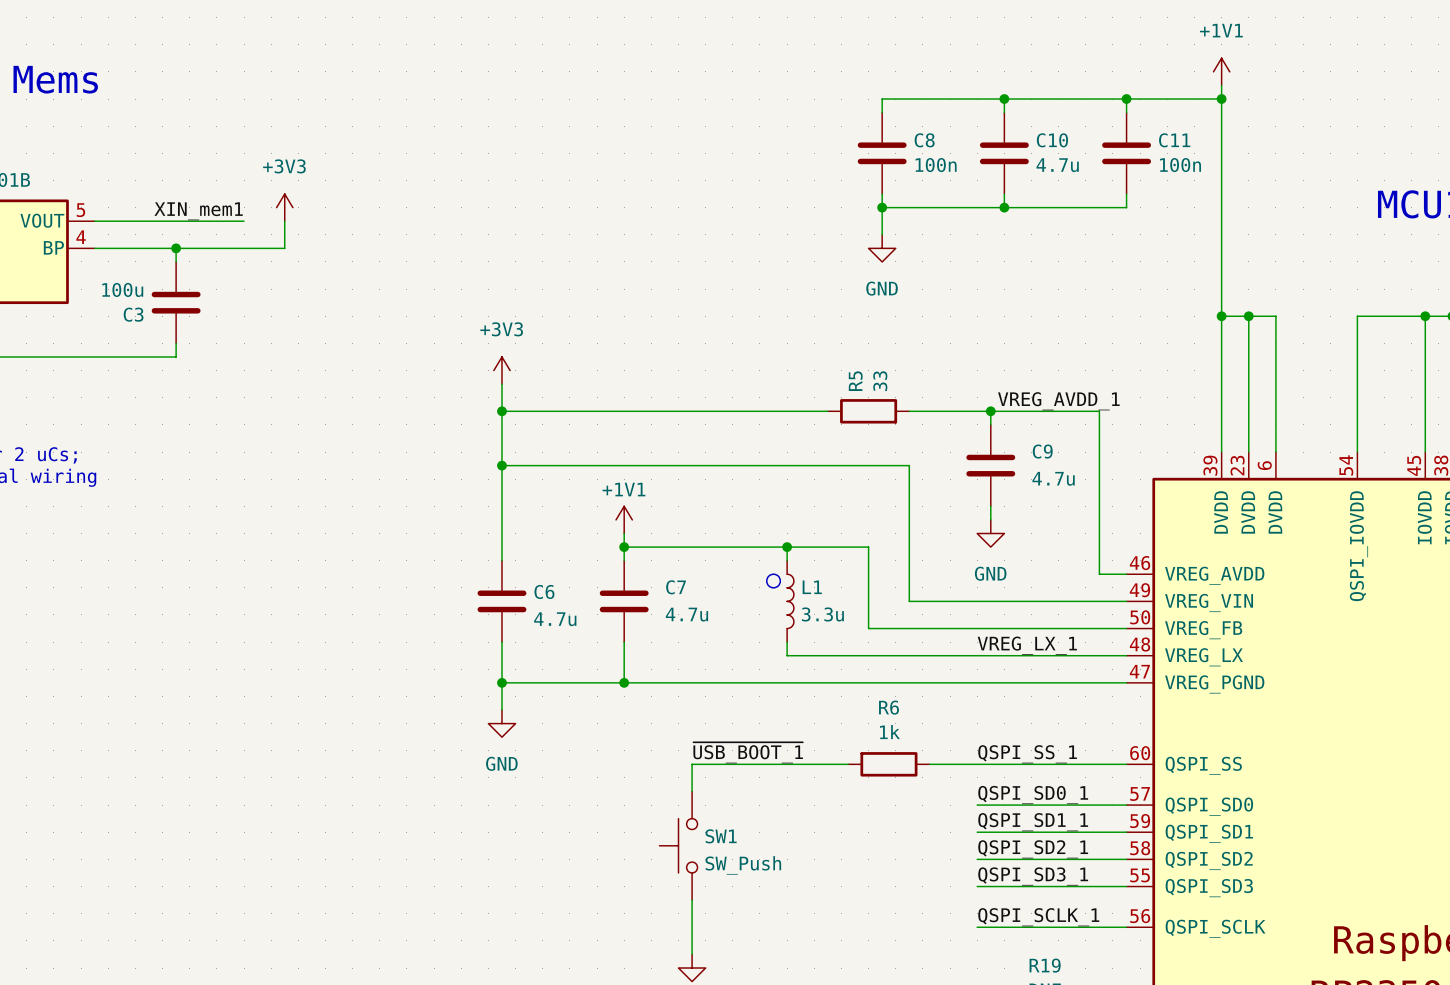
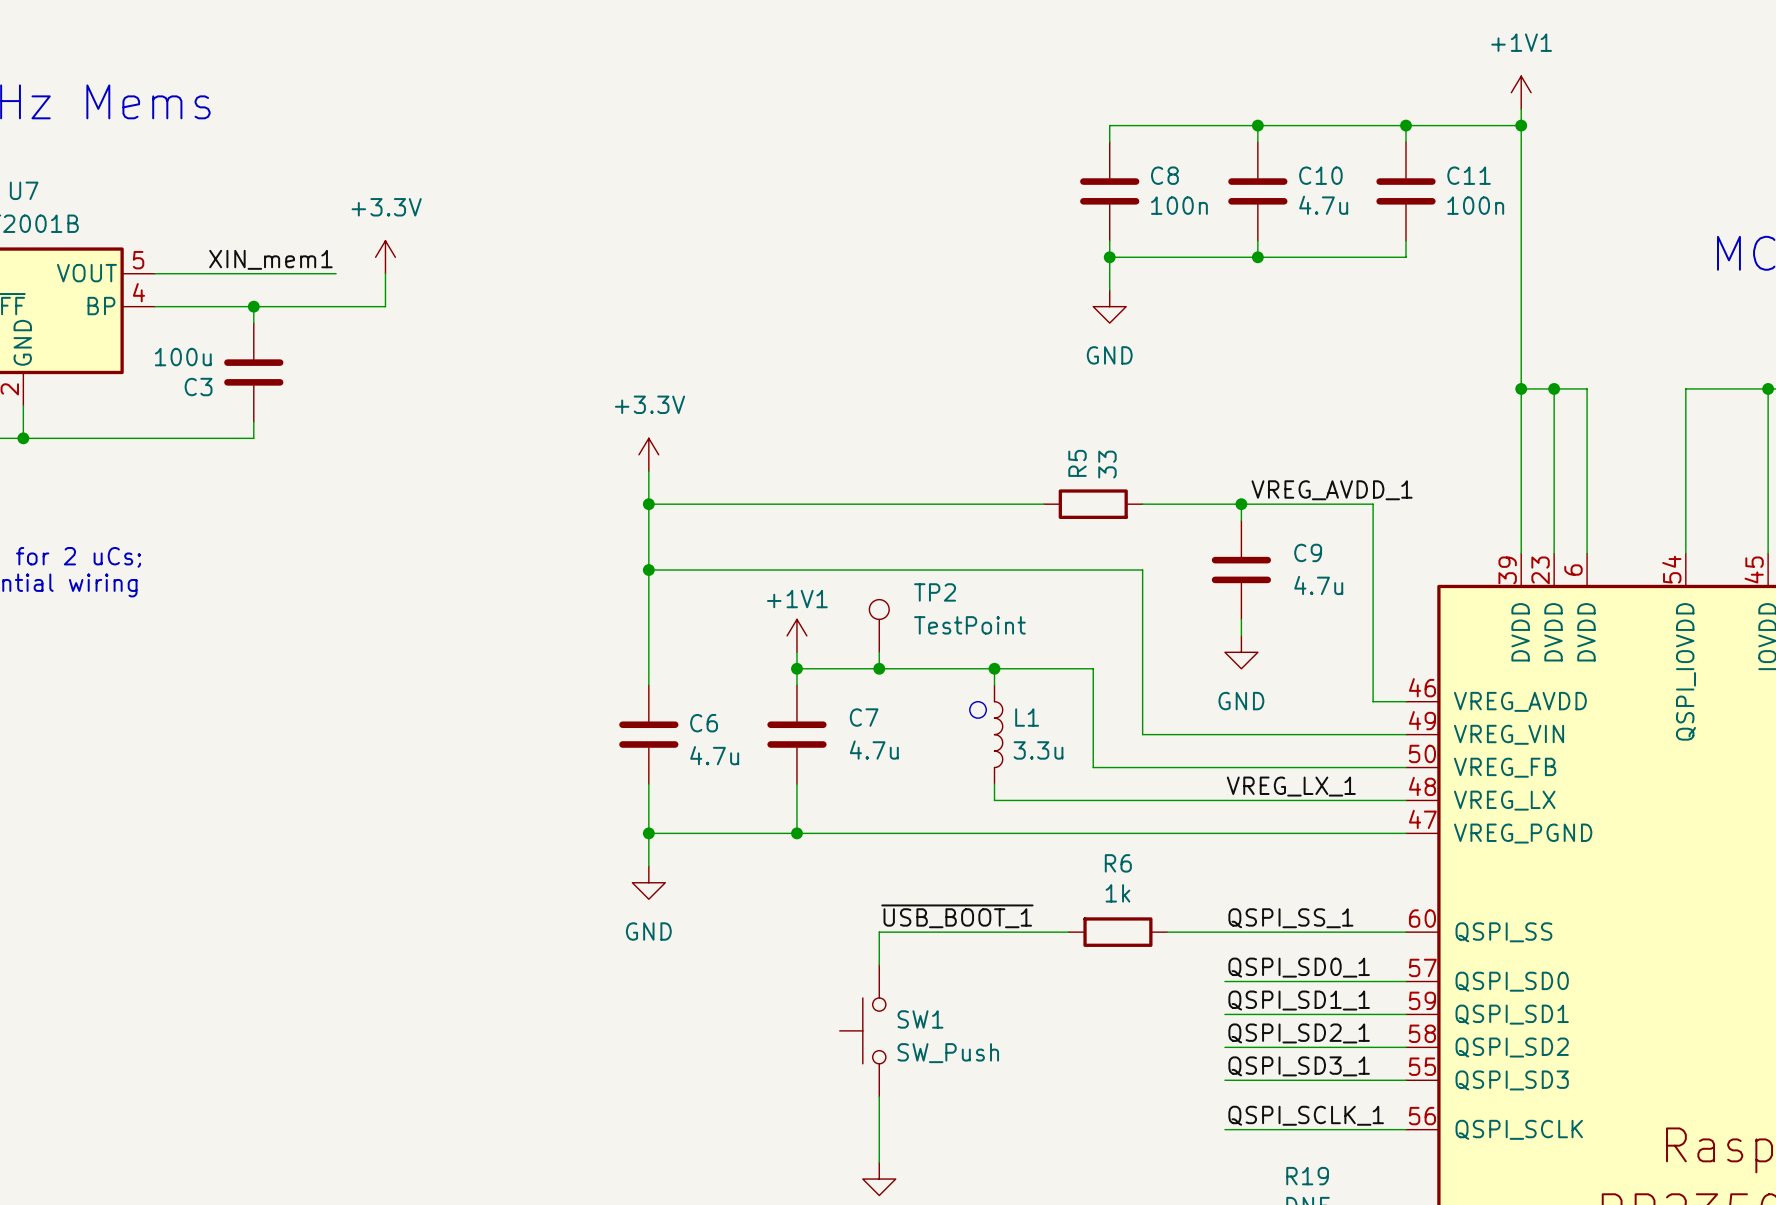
power symbol: +3V3 (284, 207) -> +3.3V (385, 257)
power symbol: +3V3 (501, 370) -> +3.3V (648, 454)
TP2: none -> TestPoint (879, 625)
wire: none -> (879, 652) (879, 668)
junction: none -> (879, 668)

